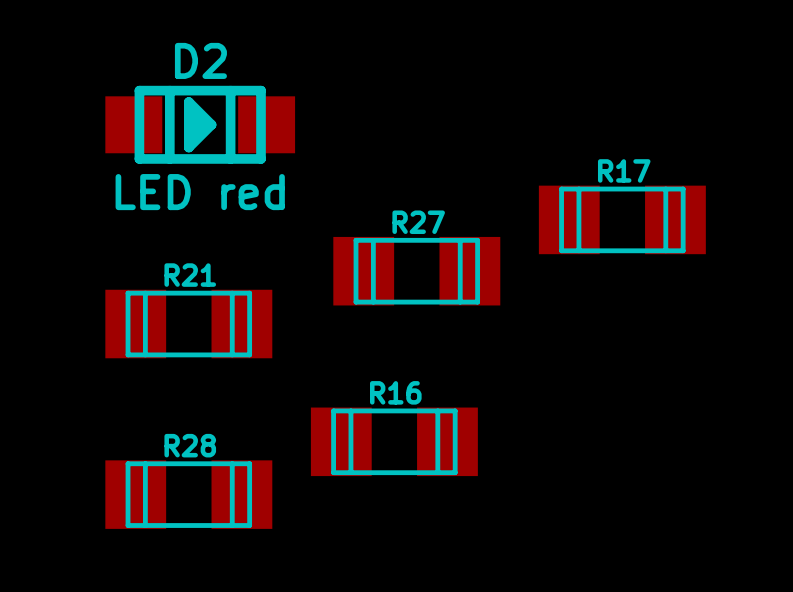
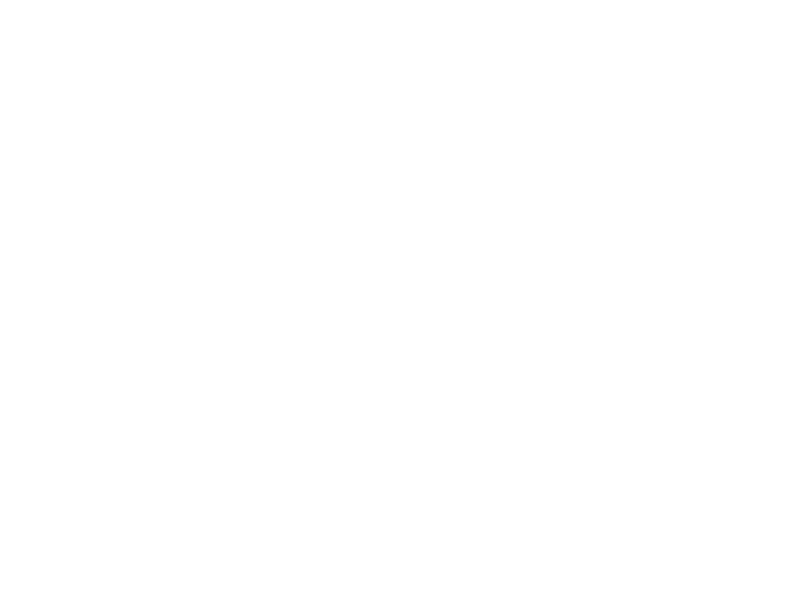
D2: LED red (200, 124) -> none
R17: (622, 219) -> none
R27: (416, 271) -> none
R21: (188, 324) -> none
R16: (394, 441) -> none
R28: (188, 494) -> none

